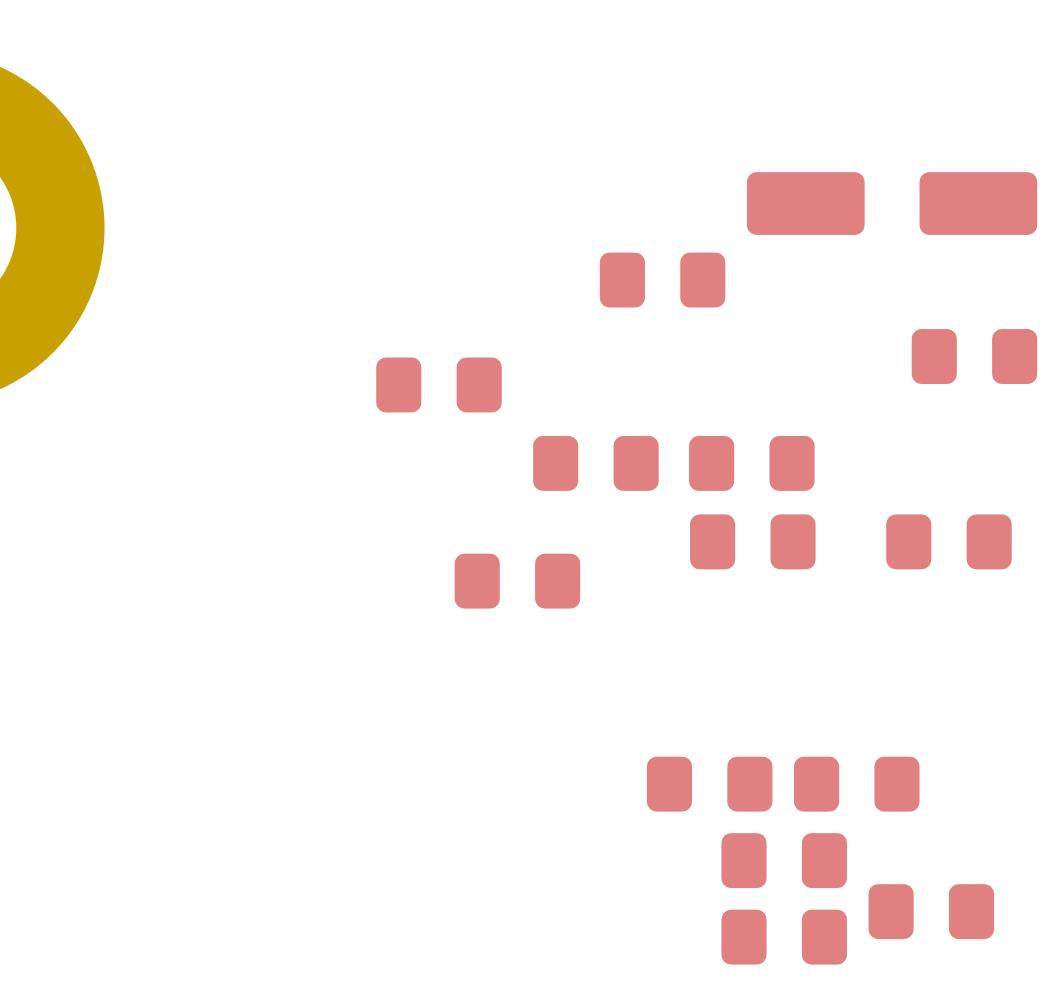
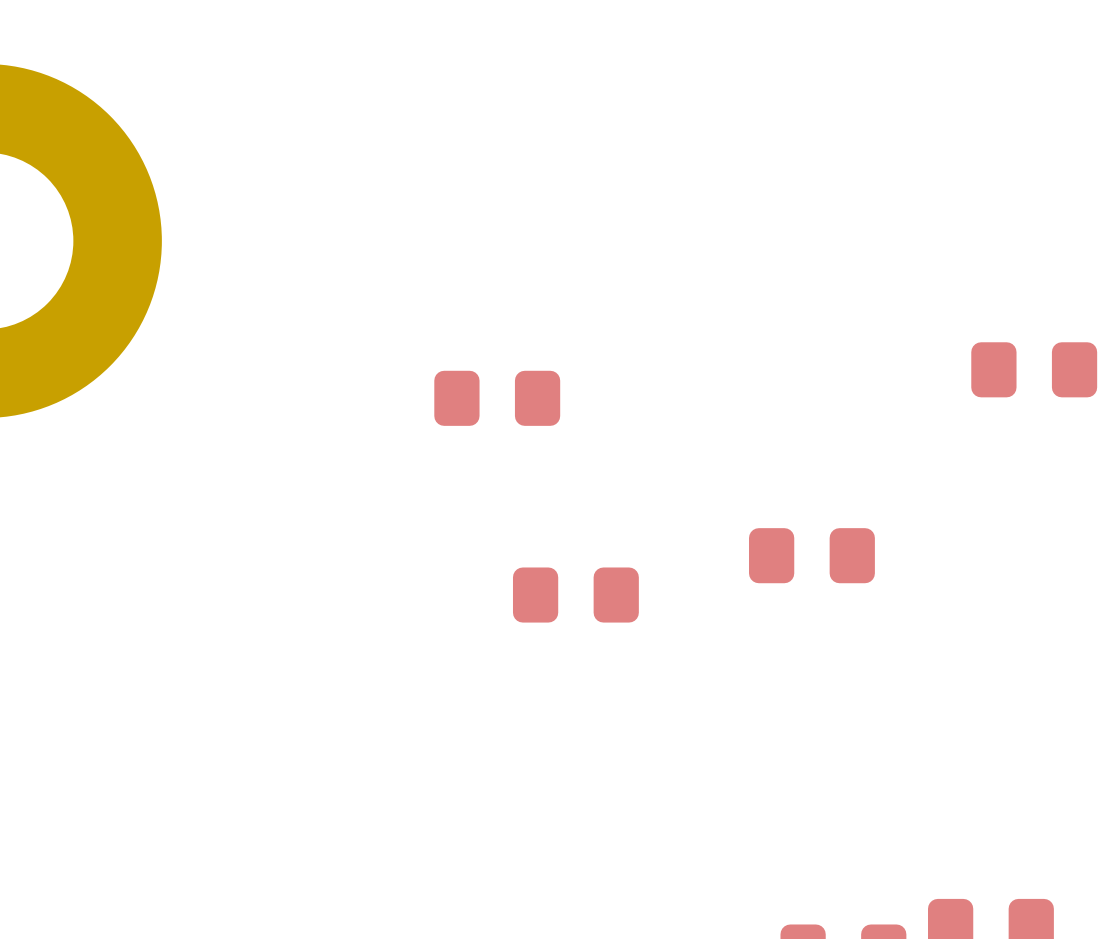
part: (892, 203) -> none
part: (662, 280) -> none
part: (595, 463) -> none
part: (751, 463) -> none
part: (948, 541) -> none
part: (709, 784) -> none
part: (856, 784) -> none
part: (784, 860) -> none

